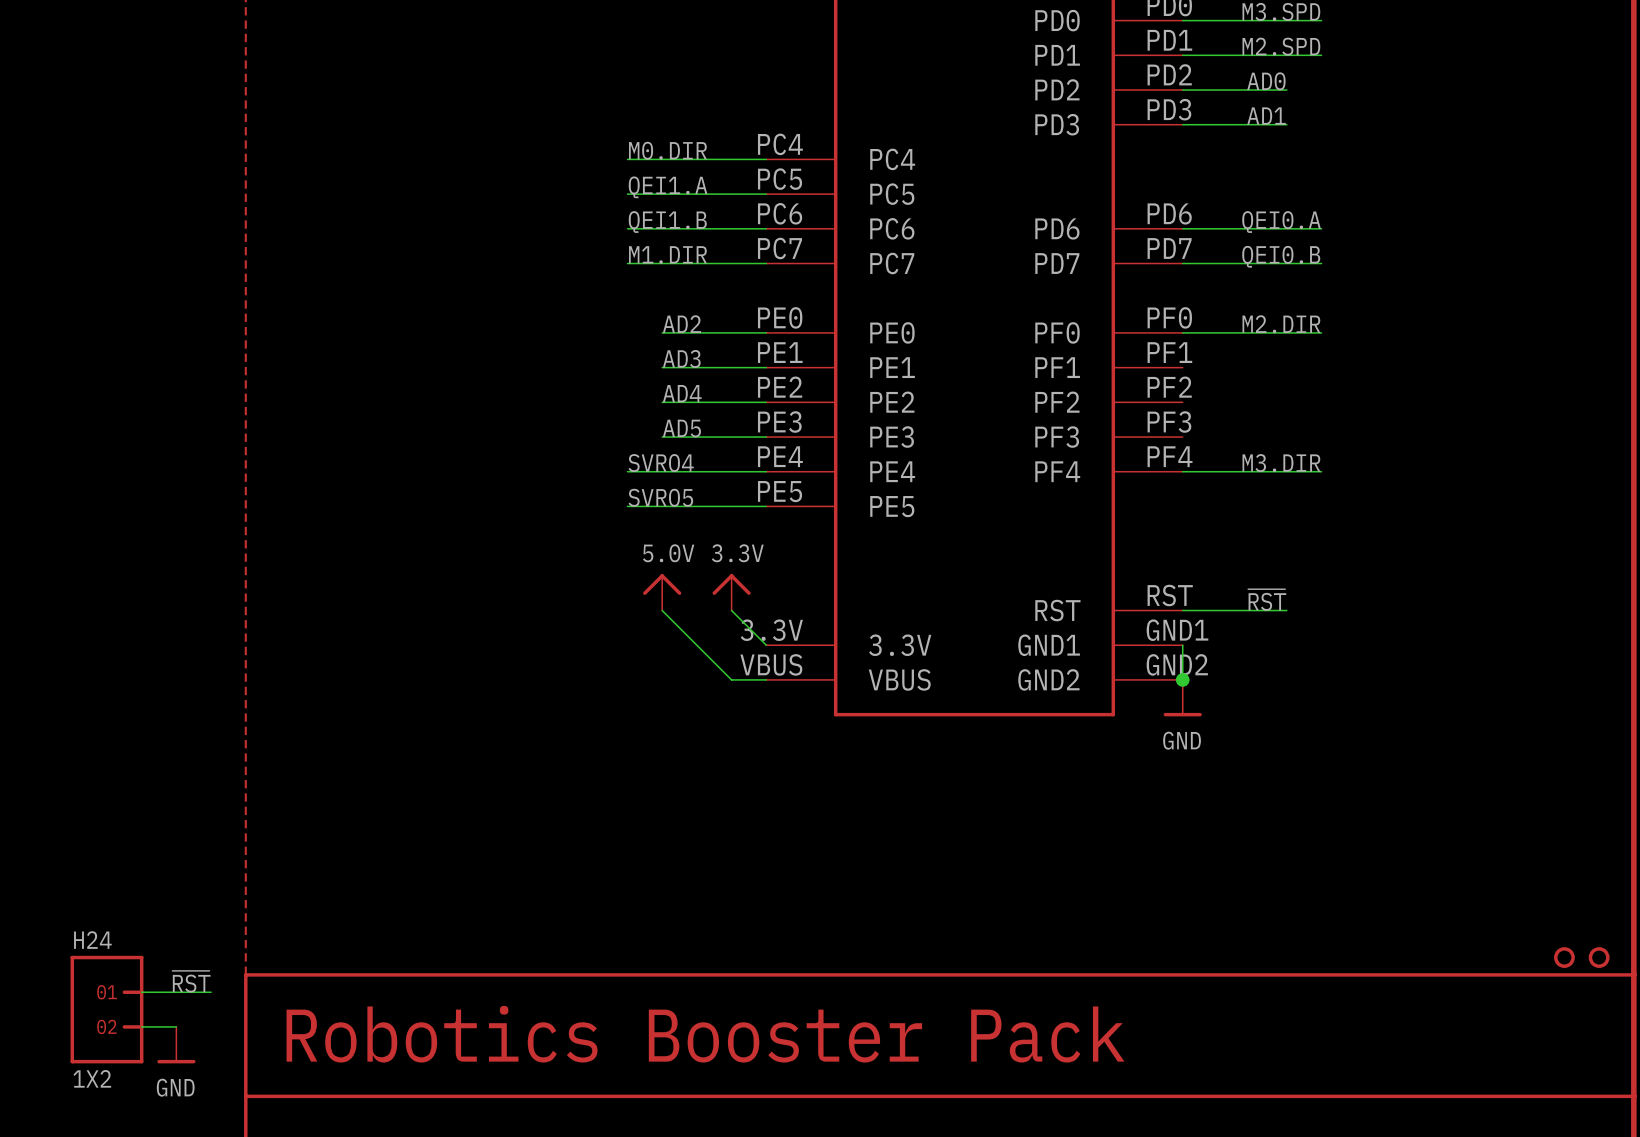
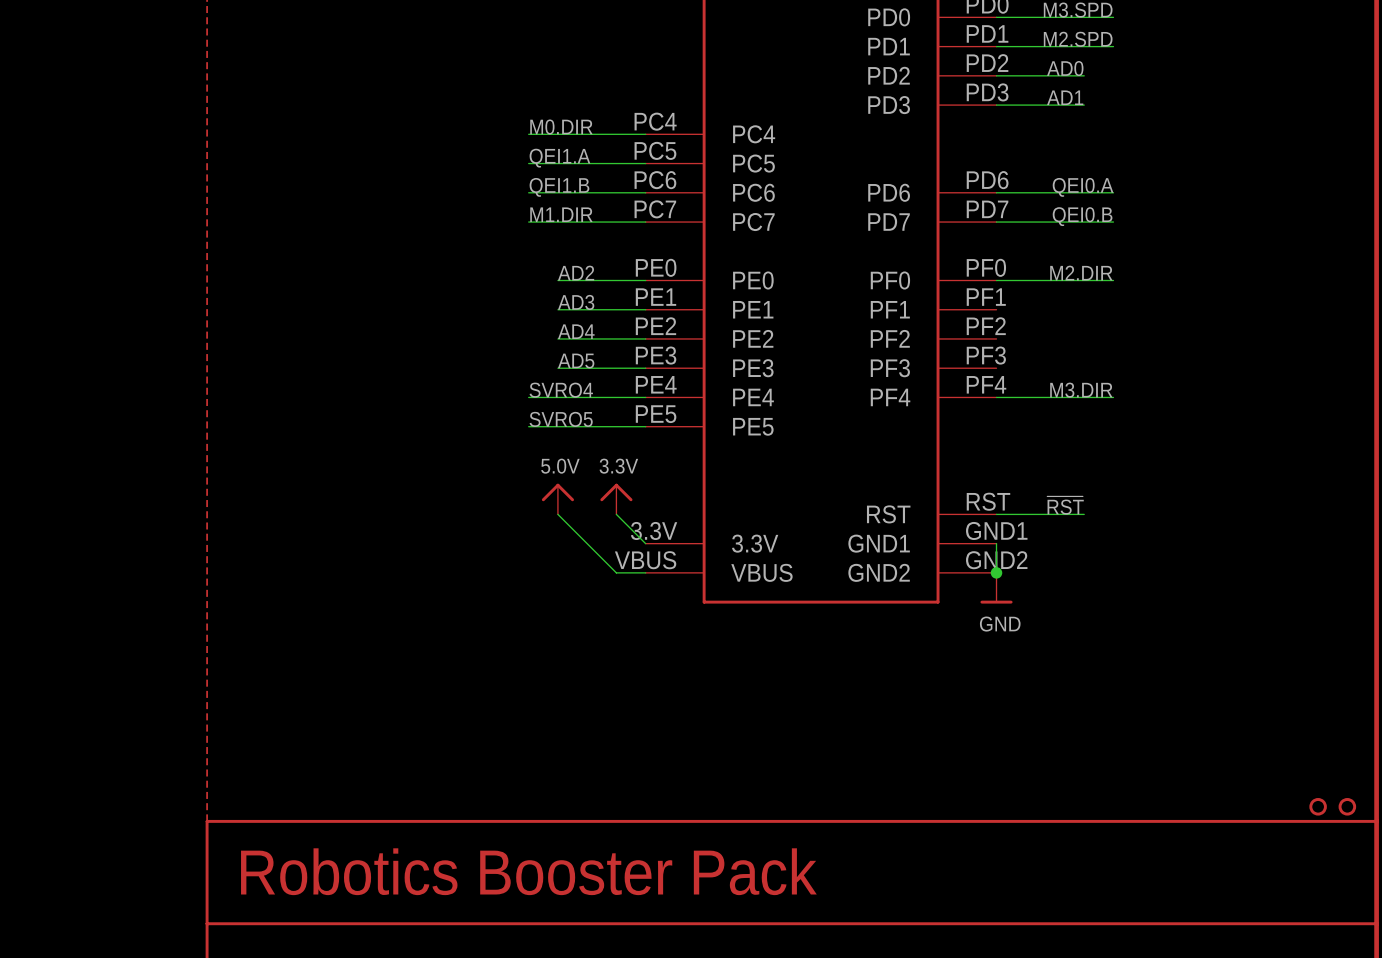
label: ~{RST} (191, 981) -> none
wire: (141, 992) (211, 992) -> none
H24: 1X2 (106, 1009) -> none
wire: (141, 1026) (176, 1026) -> none
power symbol: GND (176, 1045) -> none

